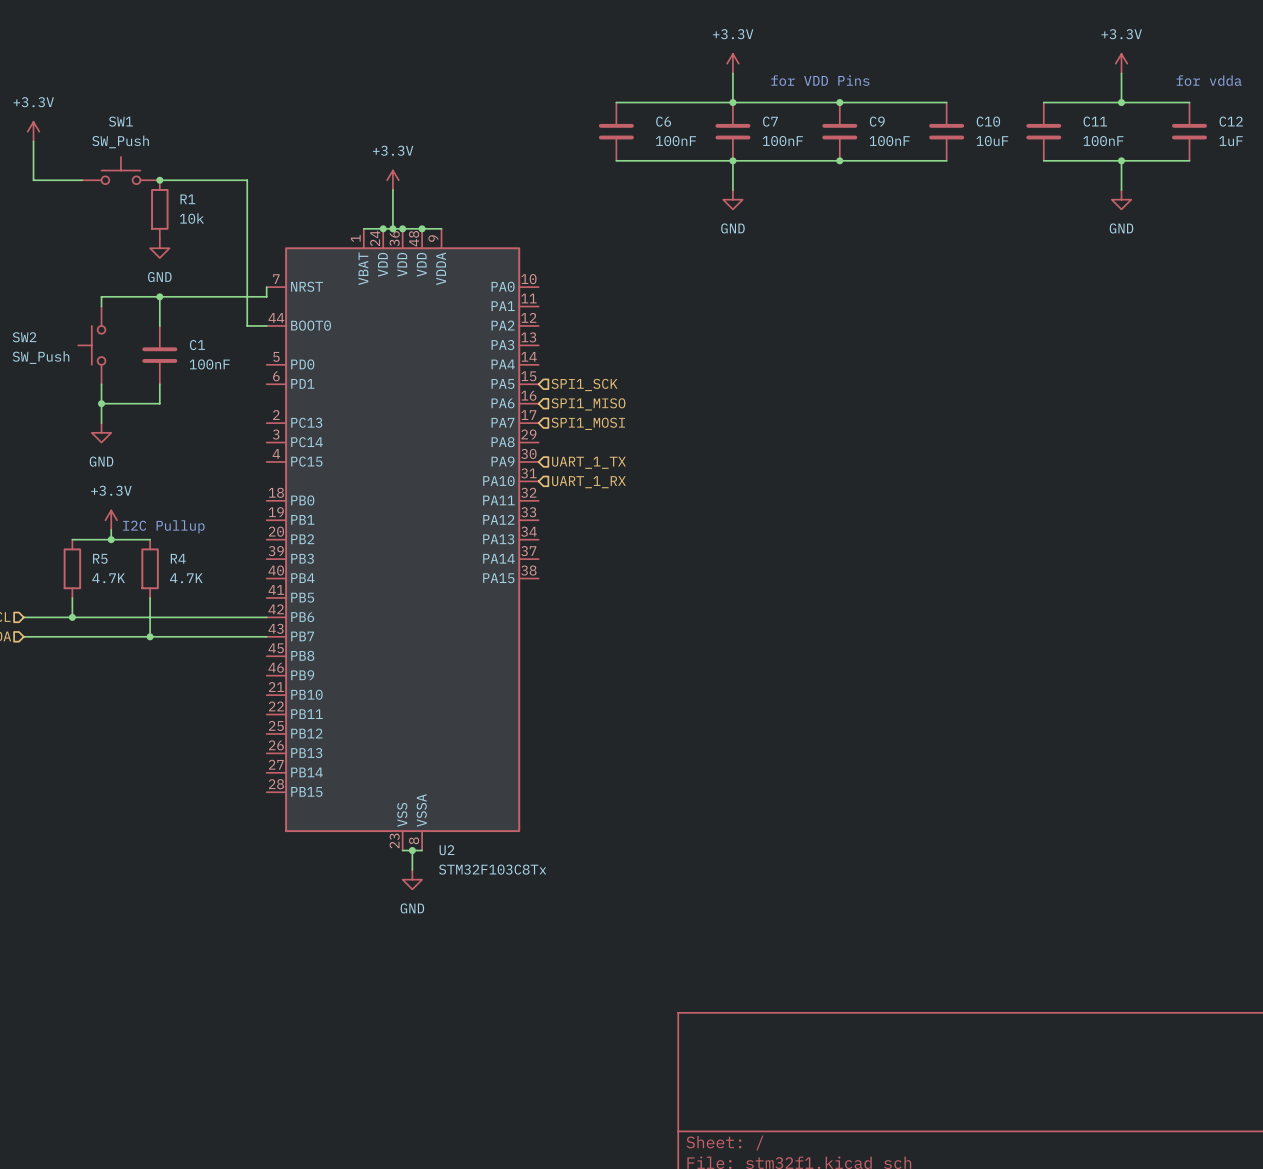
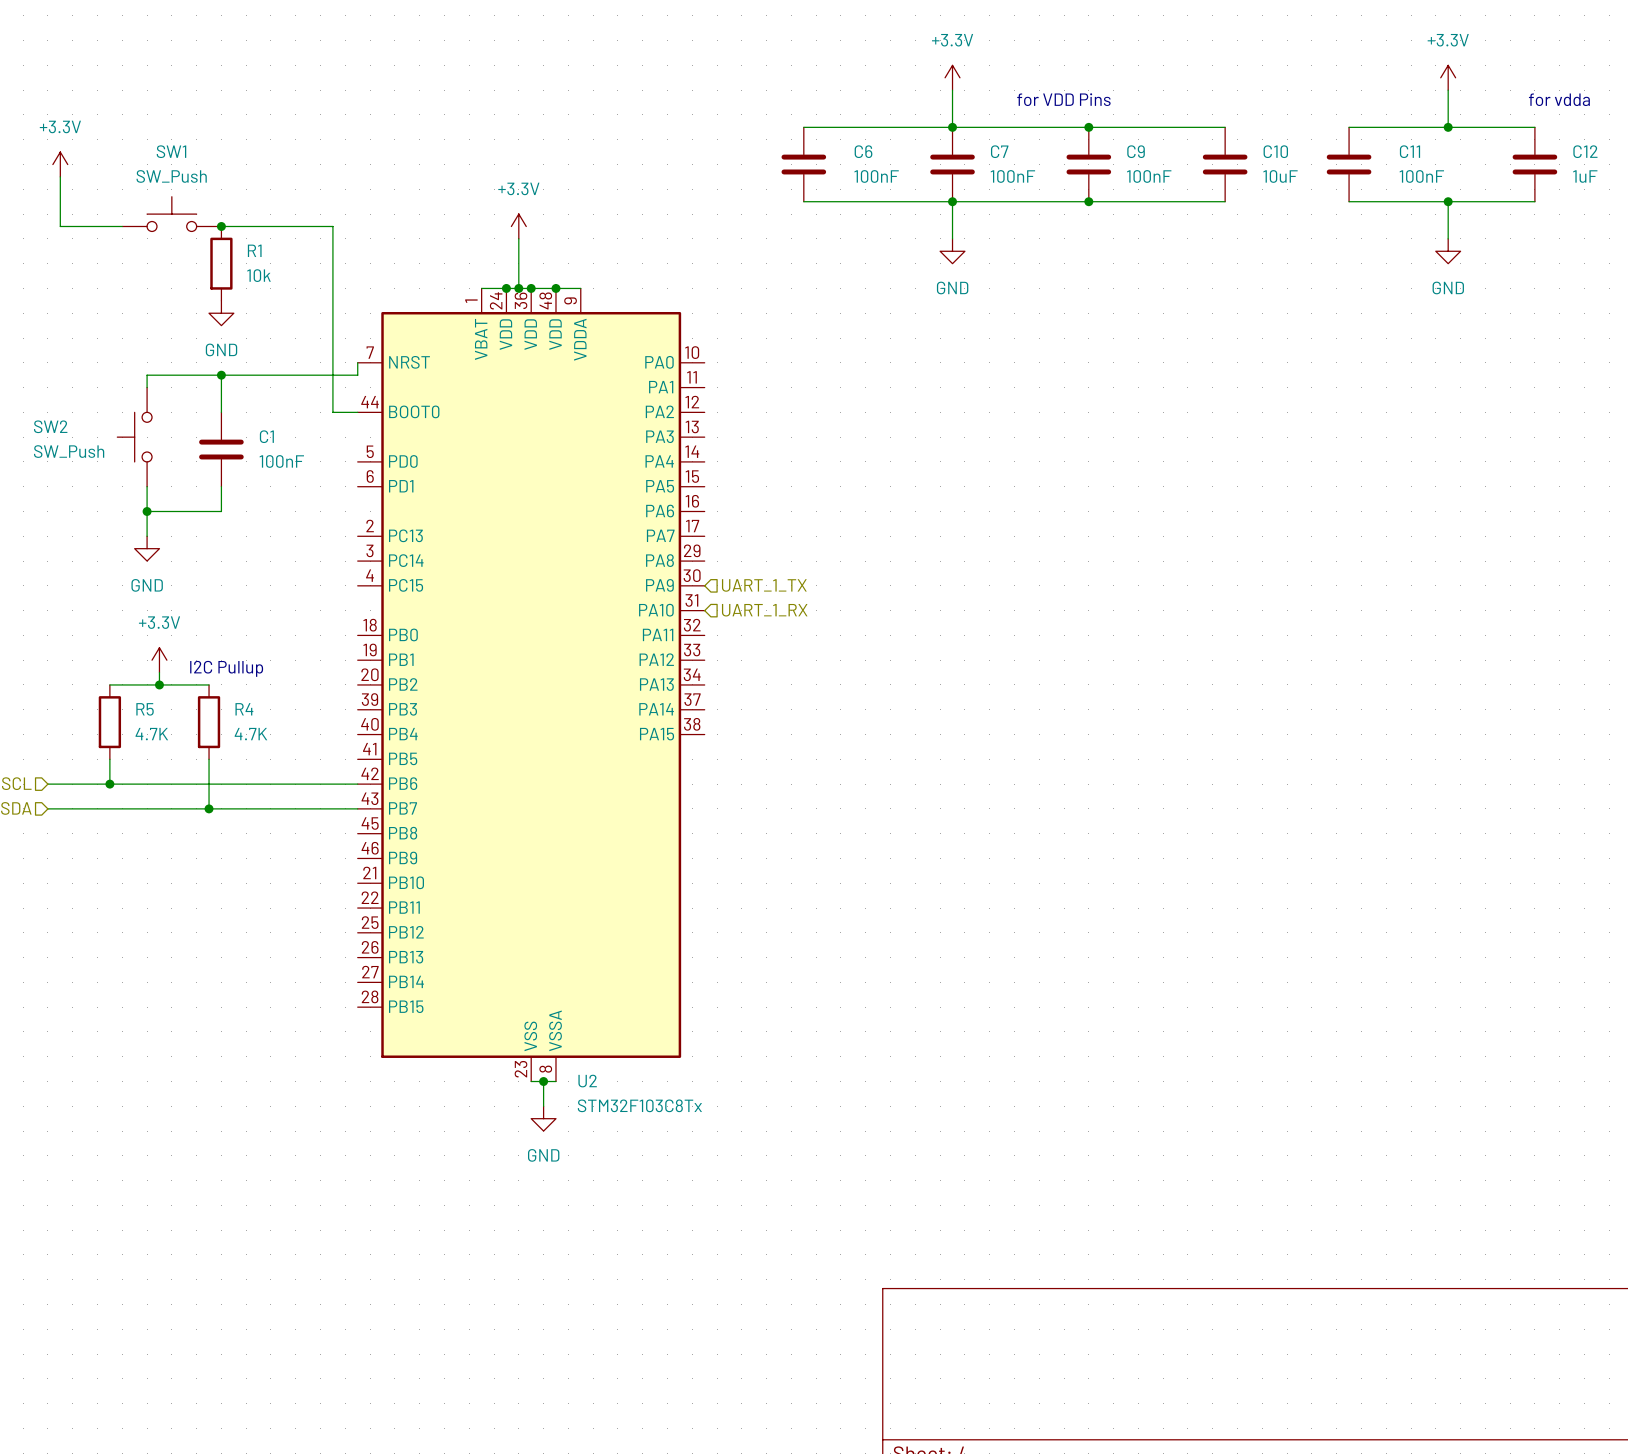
hierarchical label: SPI1_SCK (584, 384) -> none
hierarchical label: SPI1_MISO (588, 404) -> none
hierarchical label: SPI1_MOSI (588, 423) -> none

